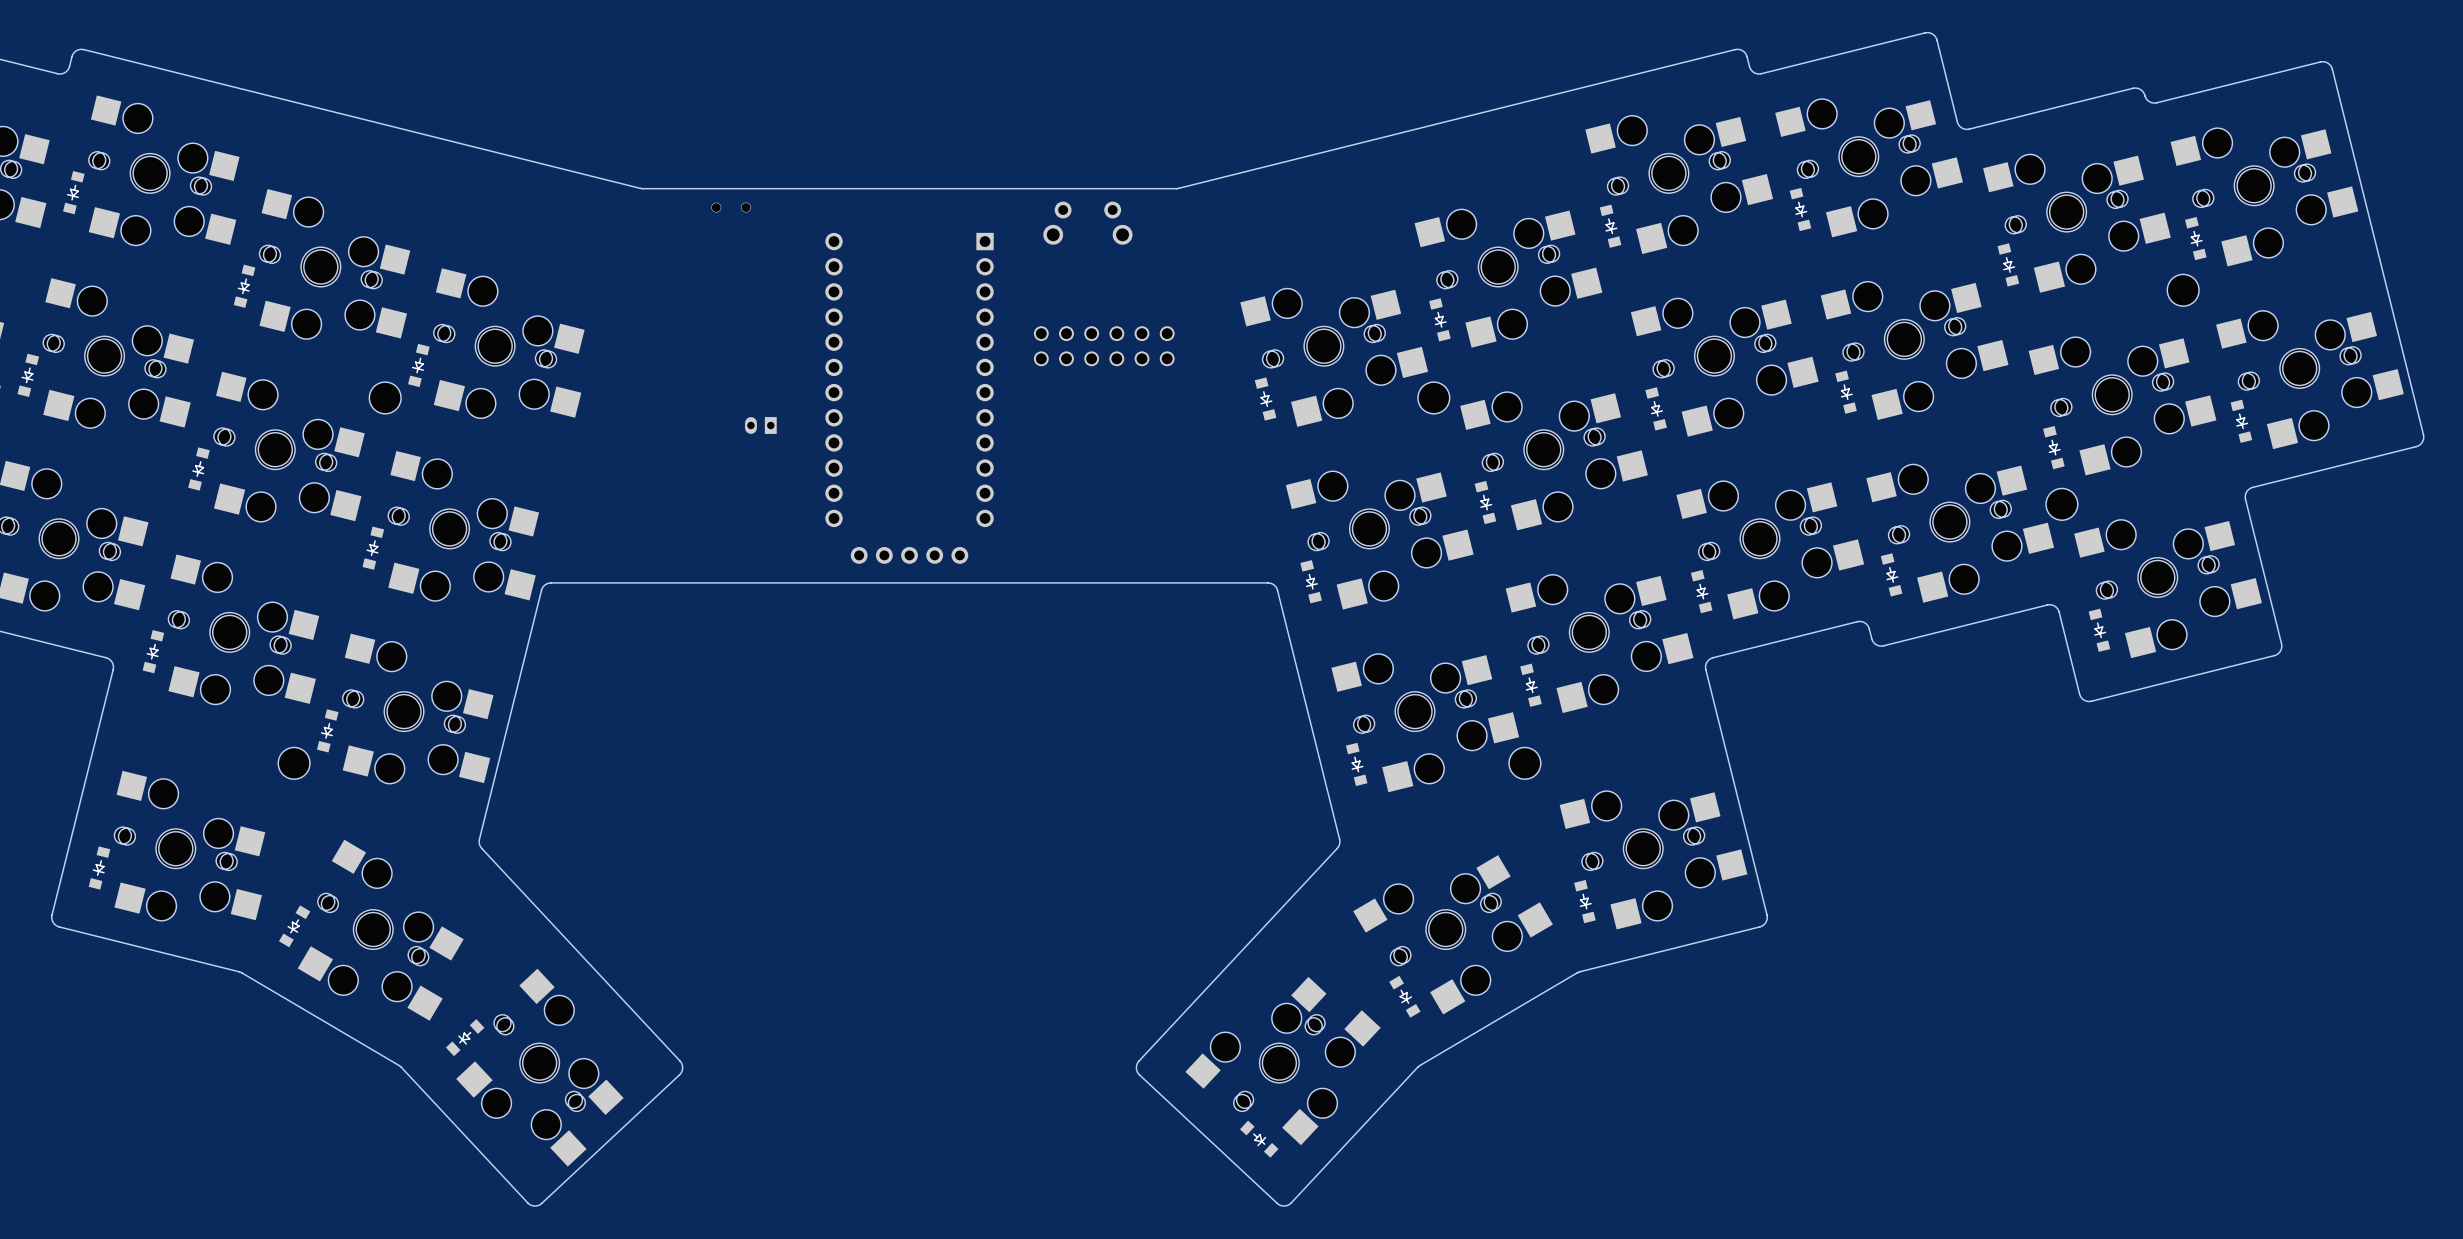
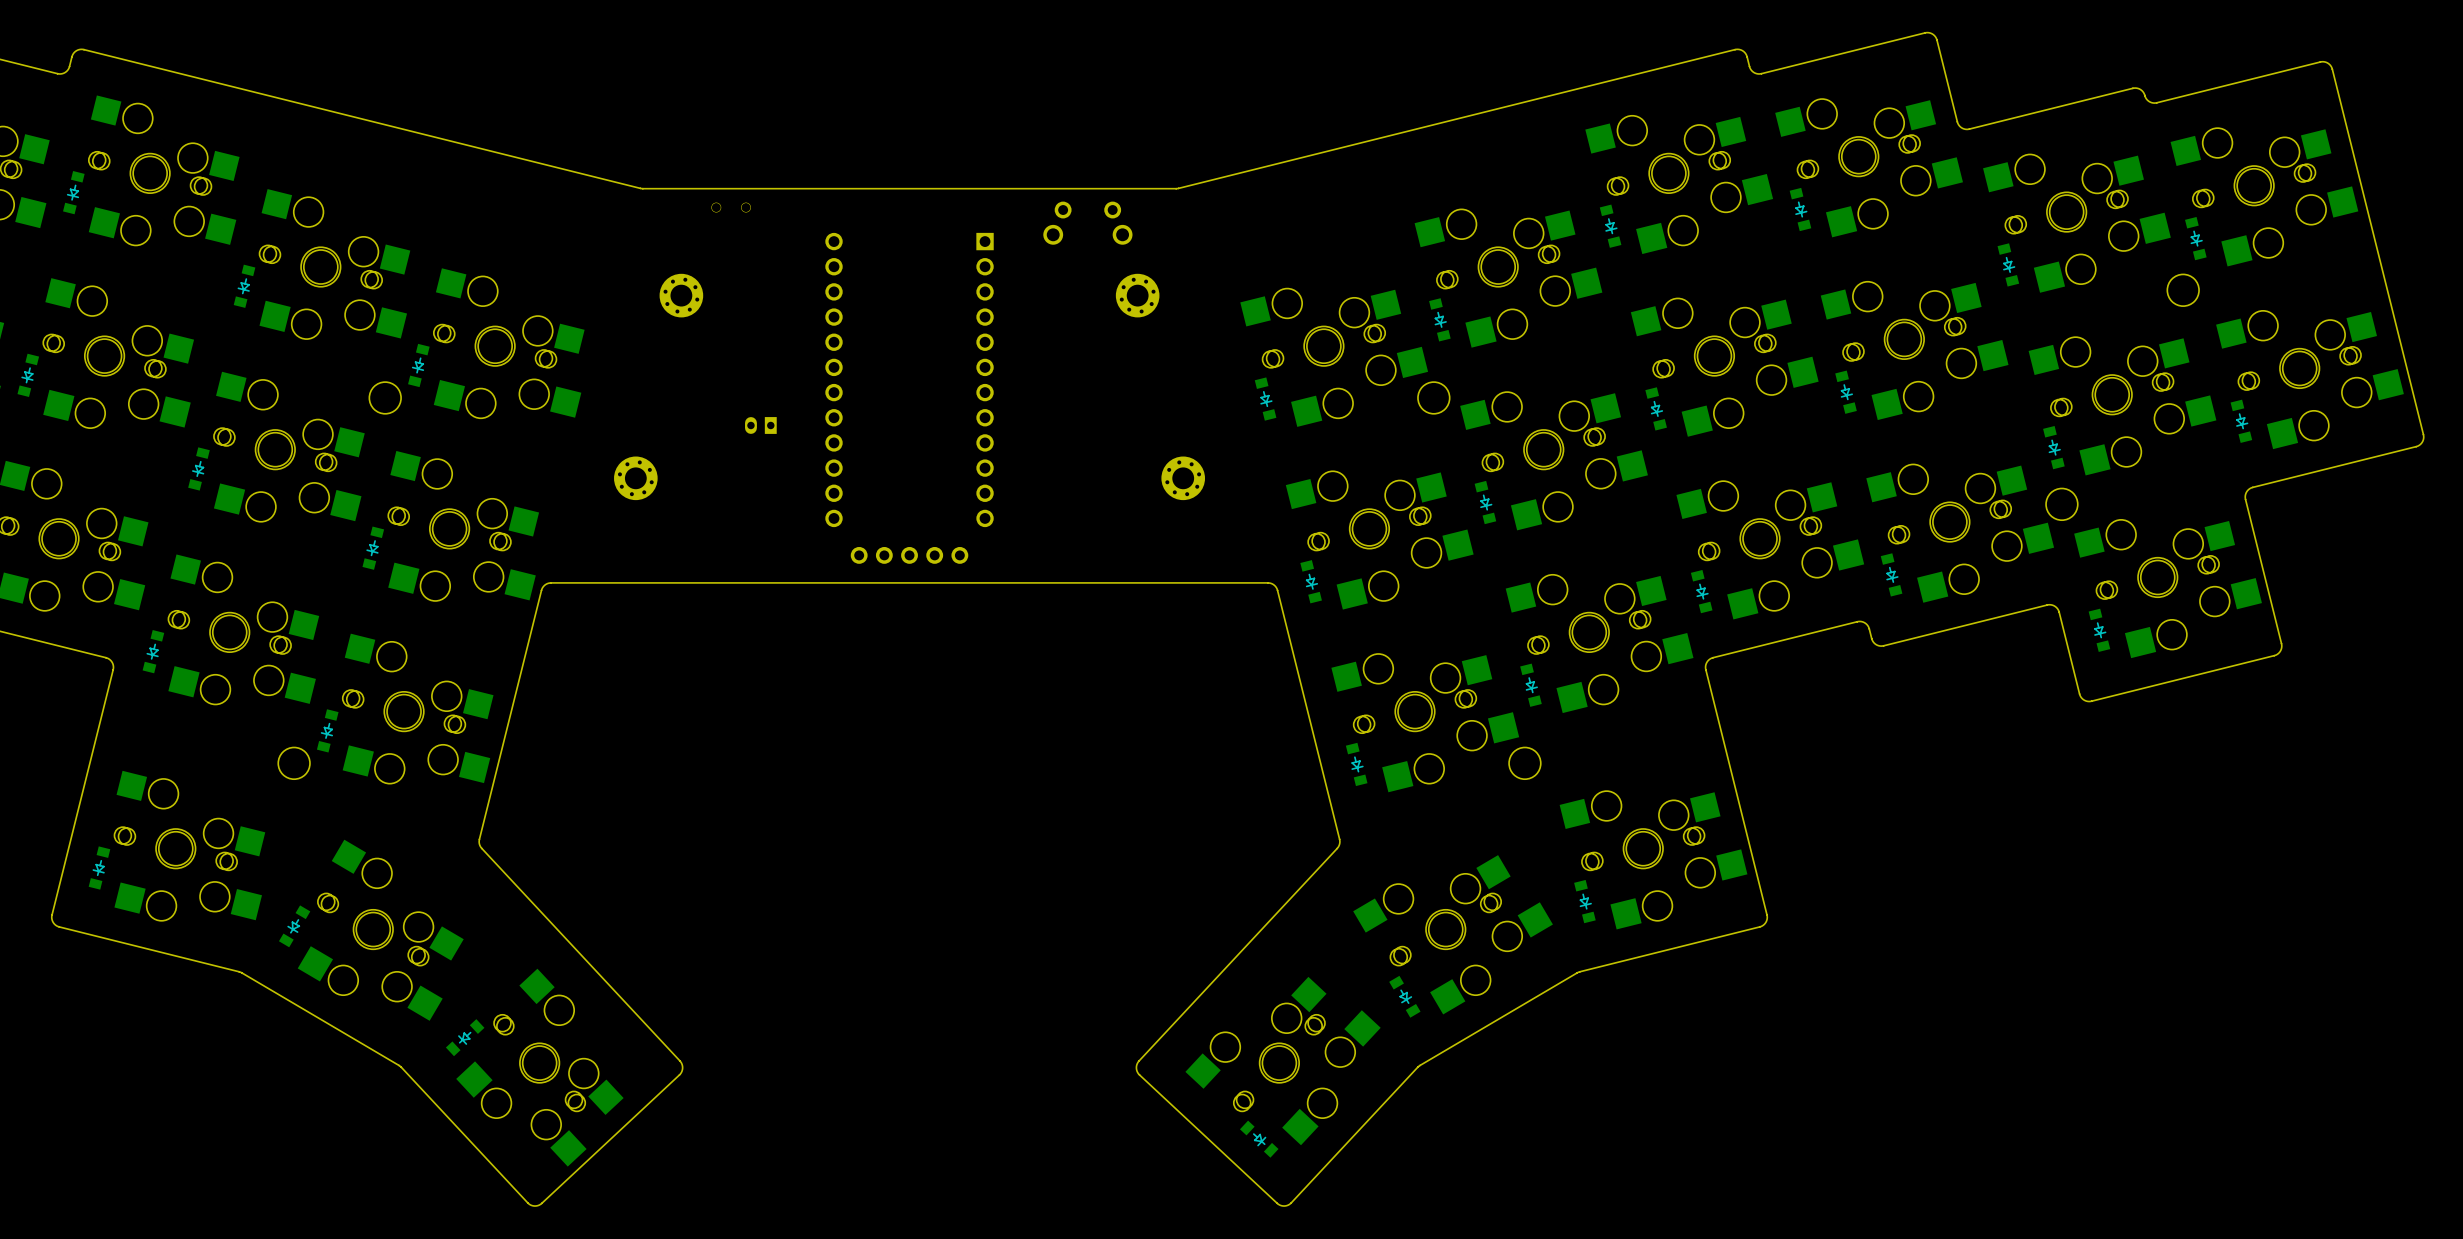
part: none -> (681, 295)
part: none -> (1137, 295)
part: (1104, 346) -> none
part: none -> (635, 478)
part: none -> (1183, 478)

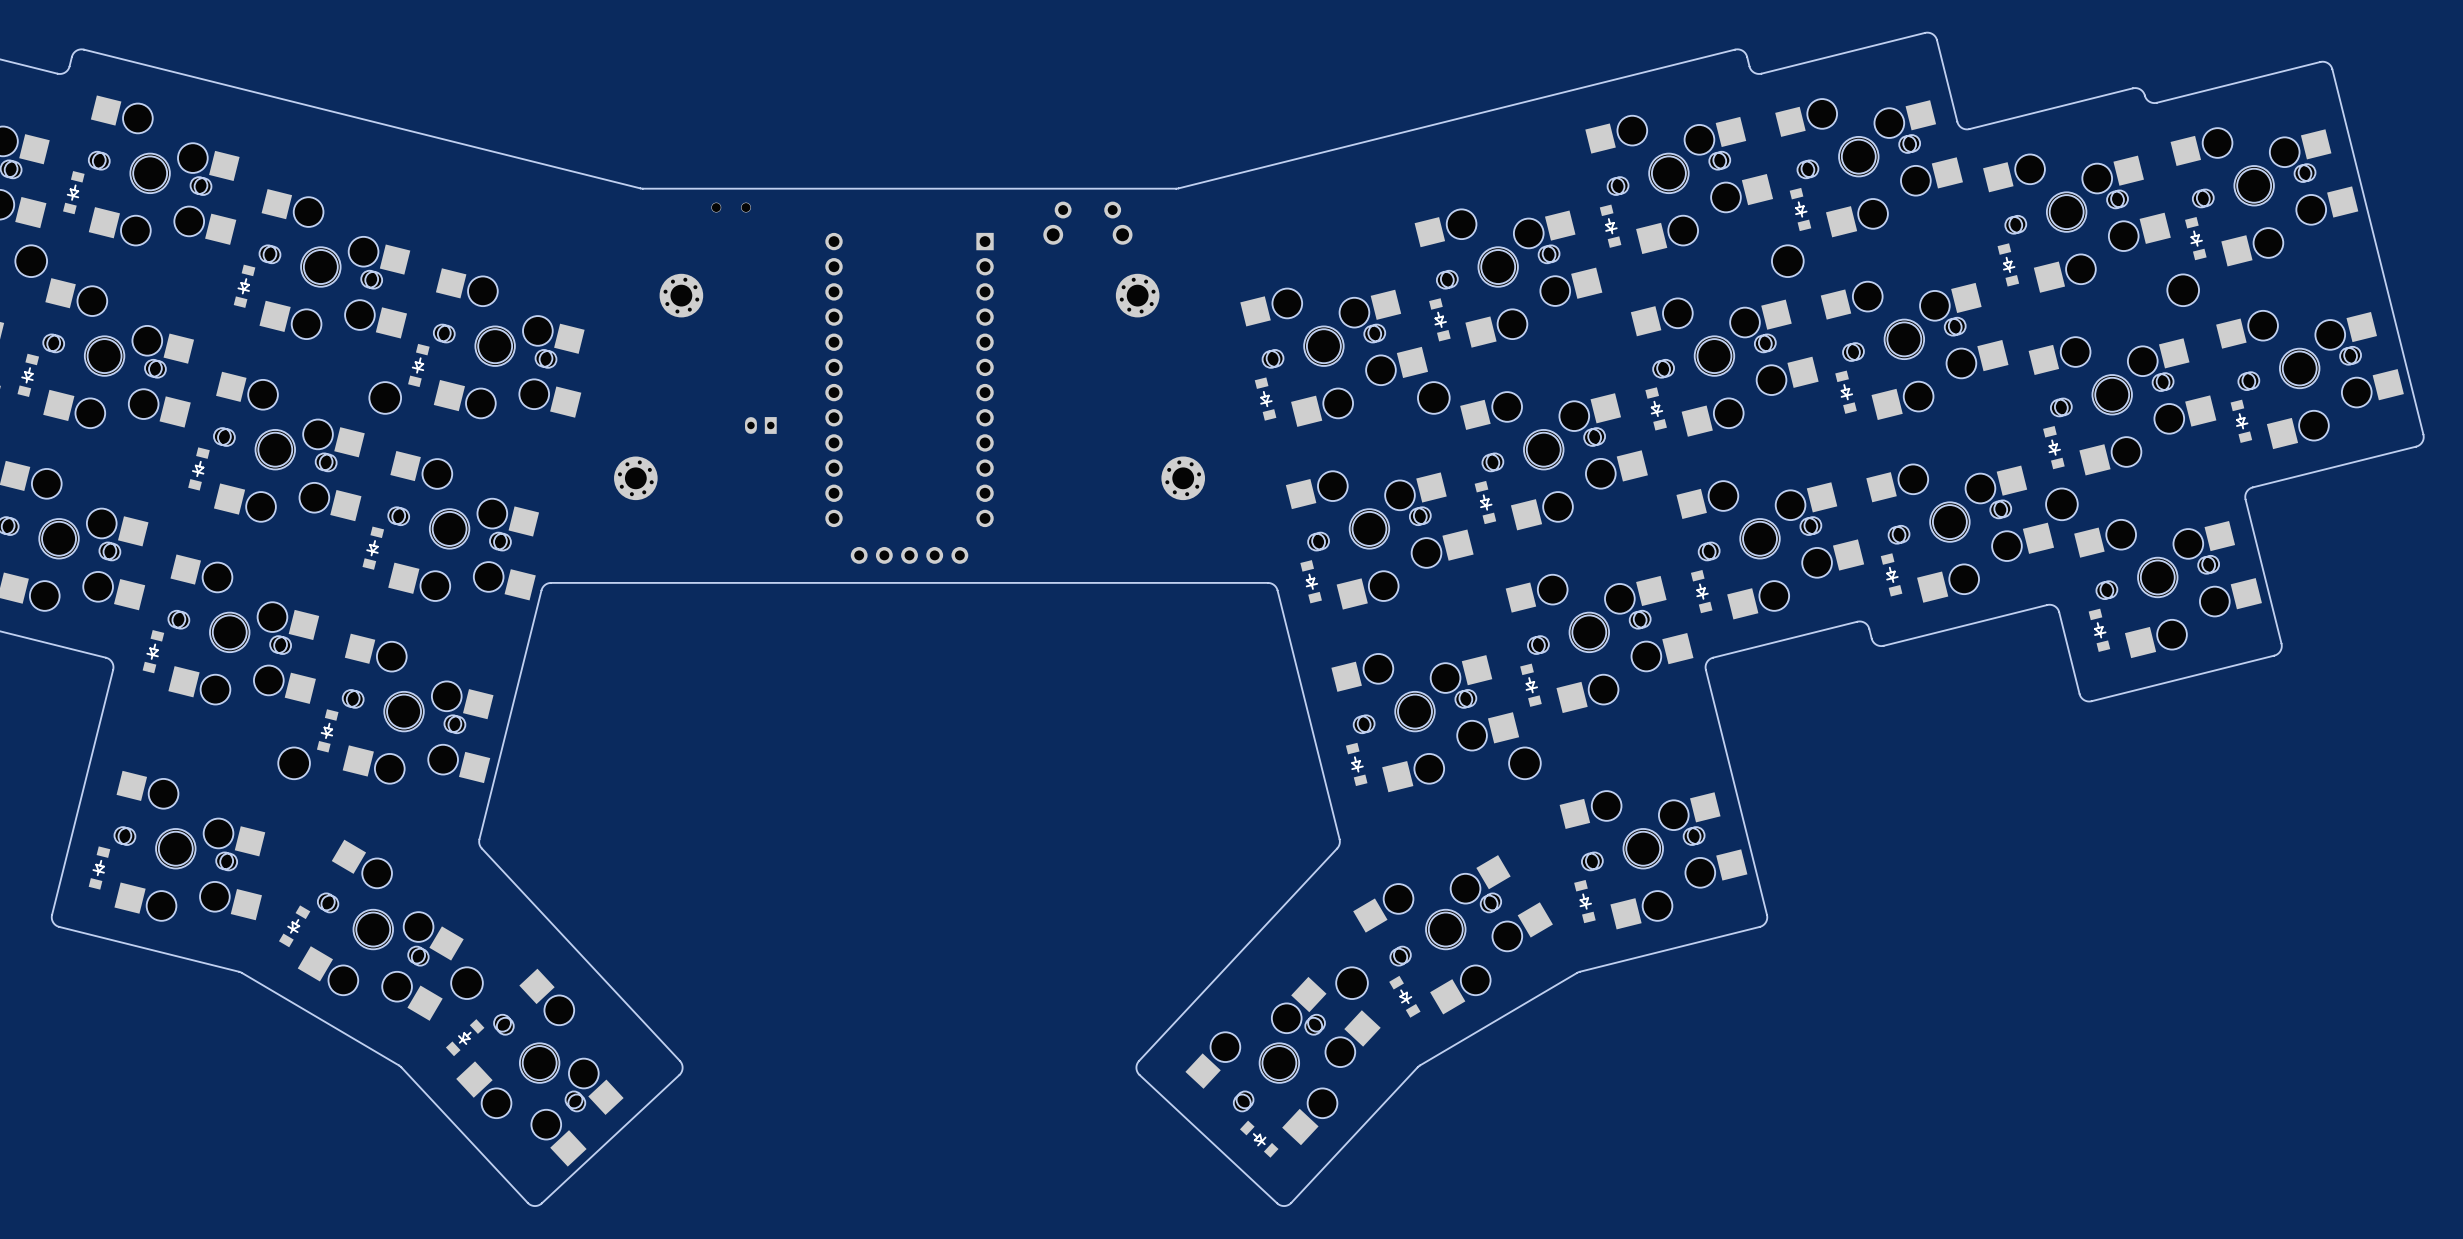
part: none -> (31, 261)
part: none -> (1787, 261)
part: none -> (467, 983)
part: none -> (1352, 983)

